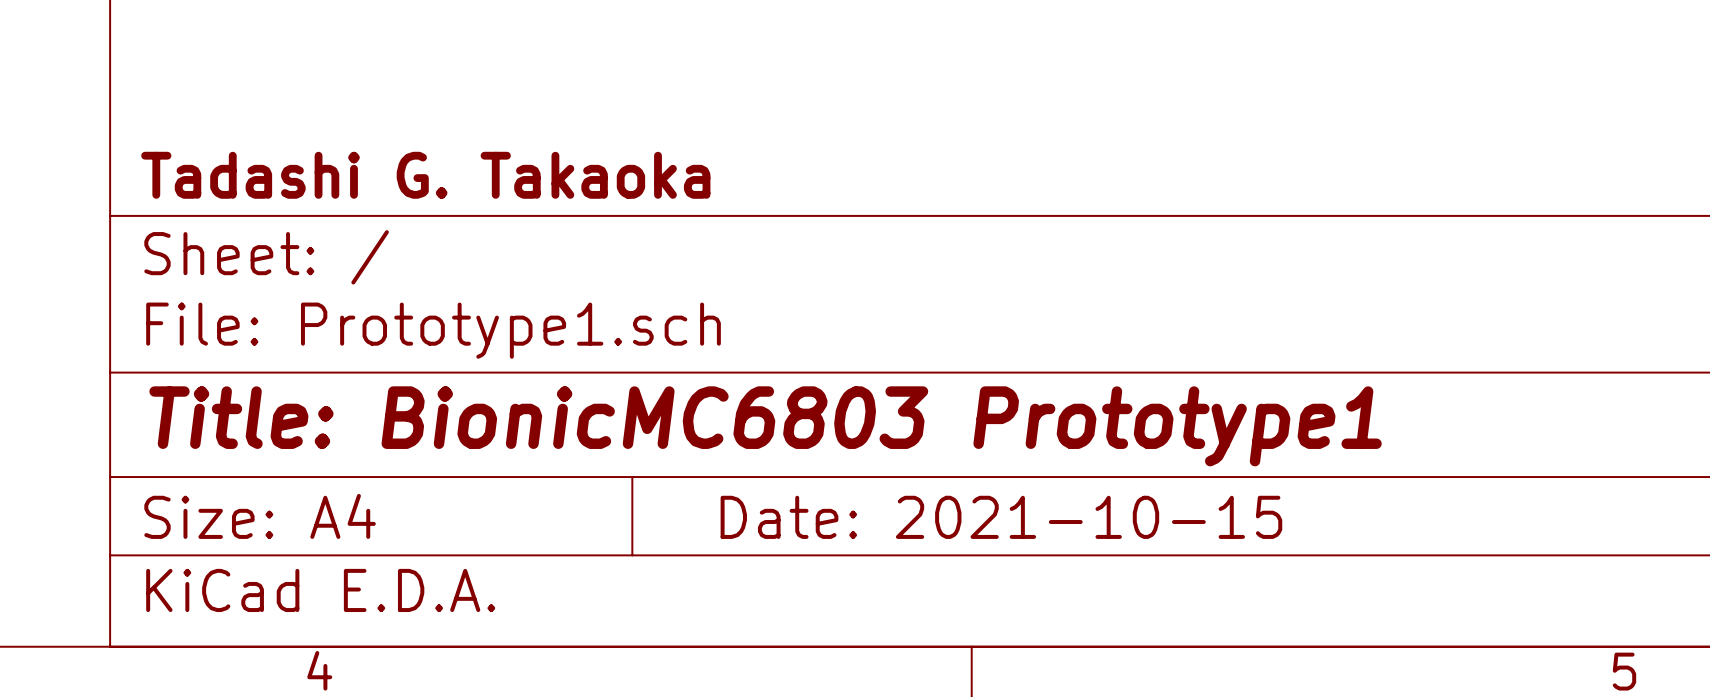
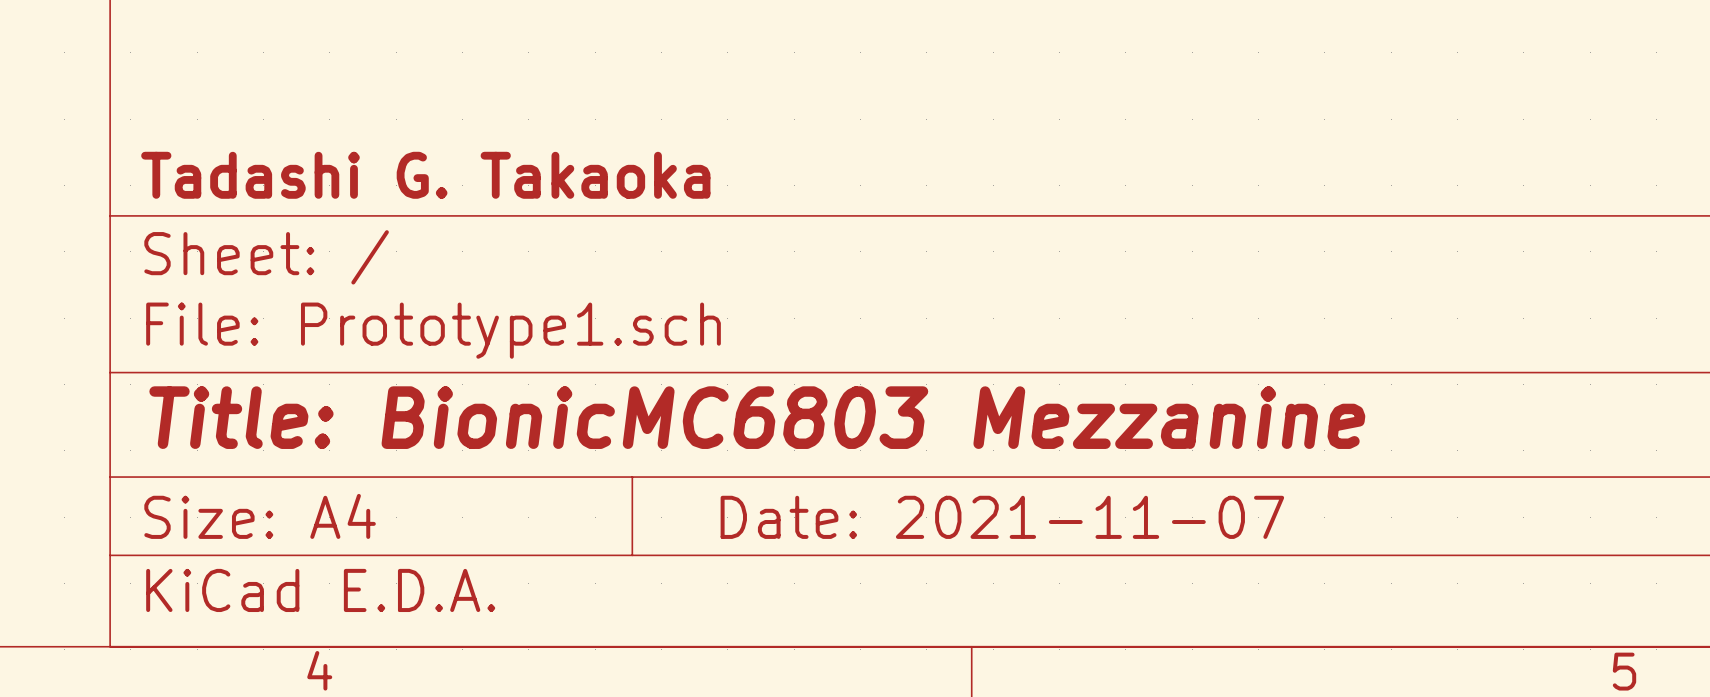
title block: Title: BionicMC6803 Prototype1 (765, 426) -> Title: BionicMC6803 Mezzanine (757, 417)
title block: Date: 2021-10-15 (1001, 517) -> Date: 2021-11-07 (1002, 517)

